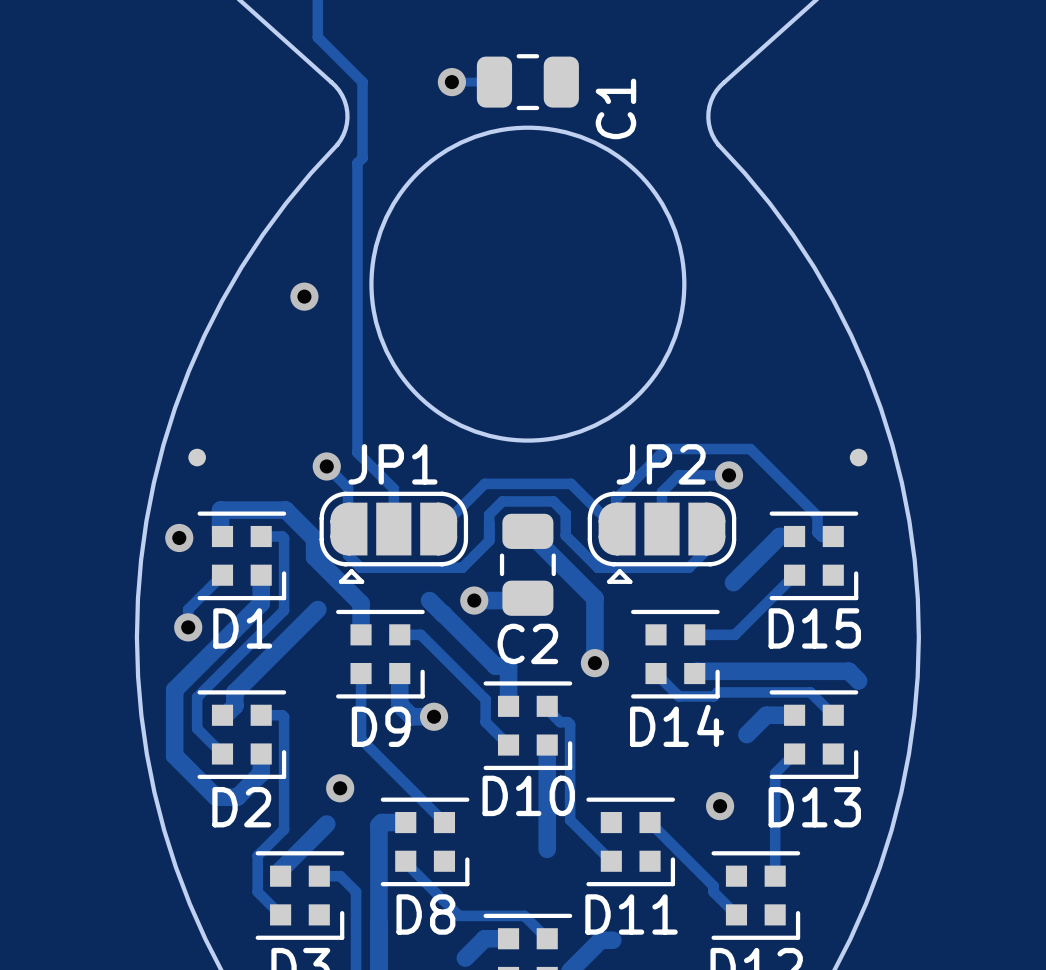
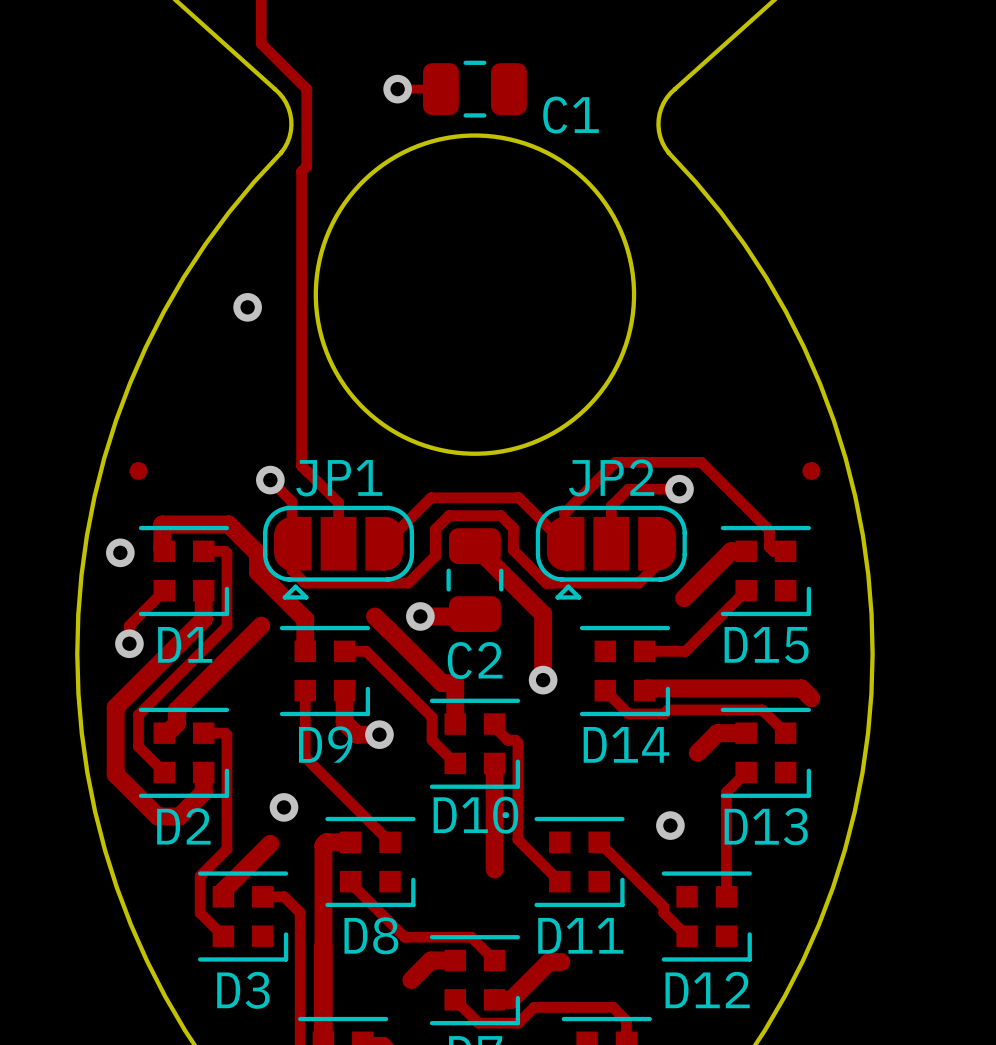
C1 name rotation: 0° (615, 108) -> 90° clockwise (570, 115)

